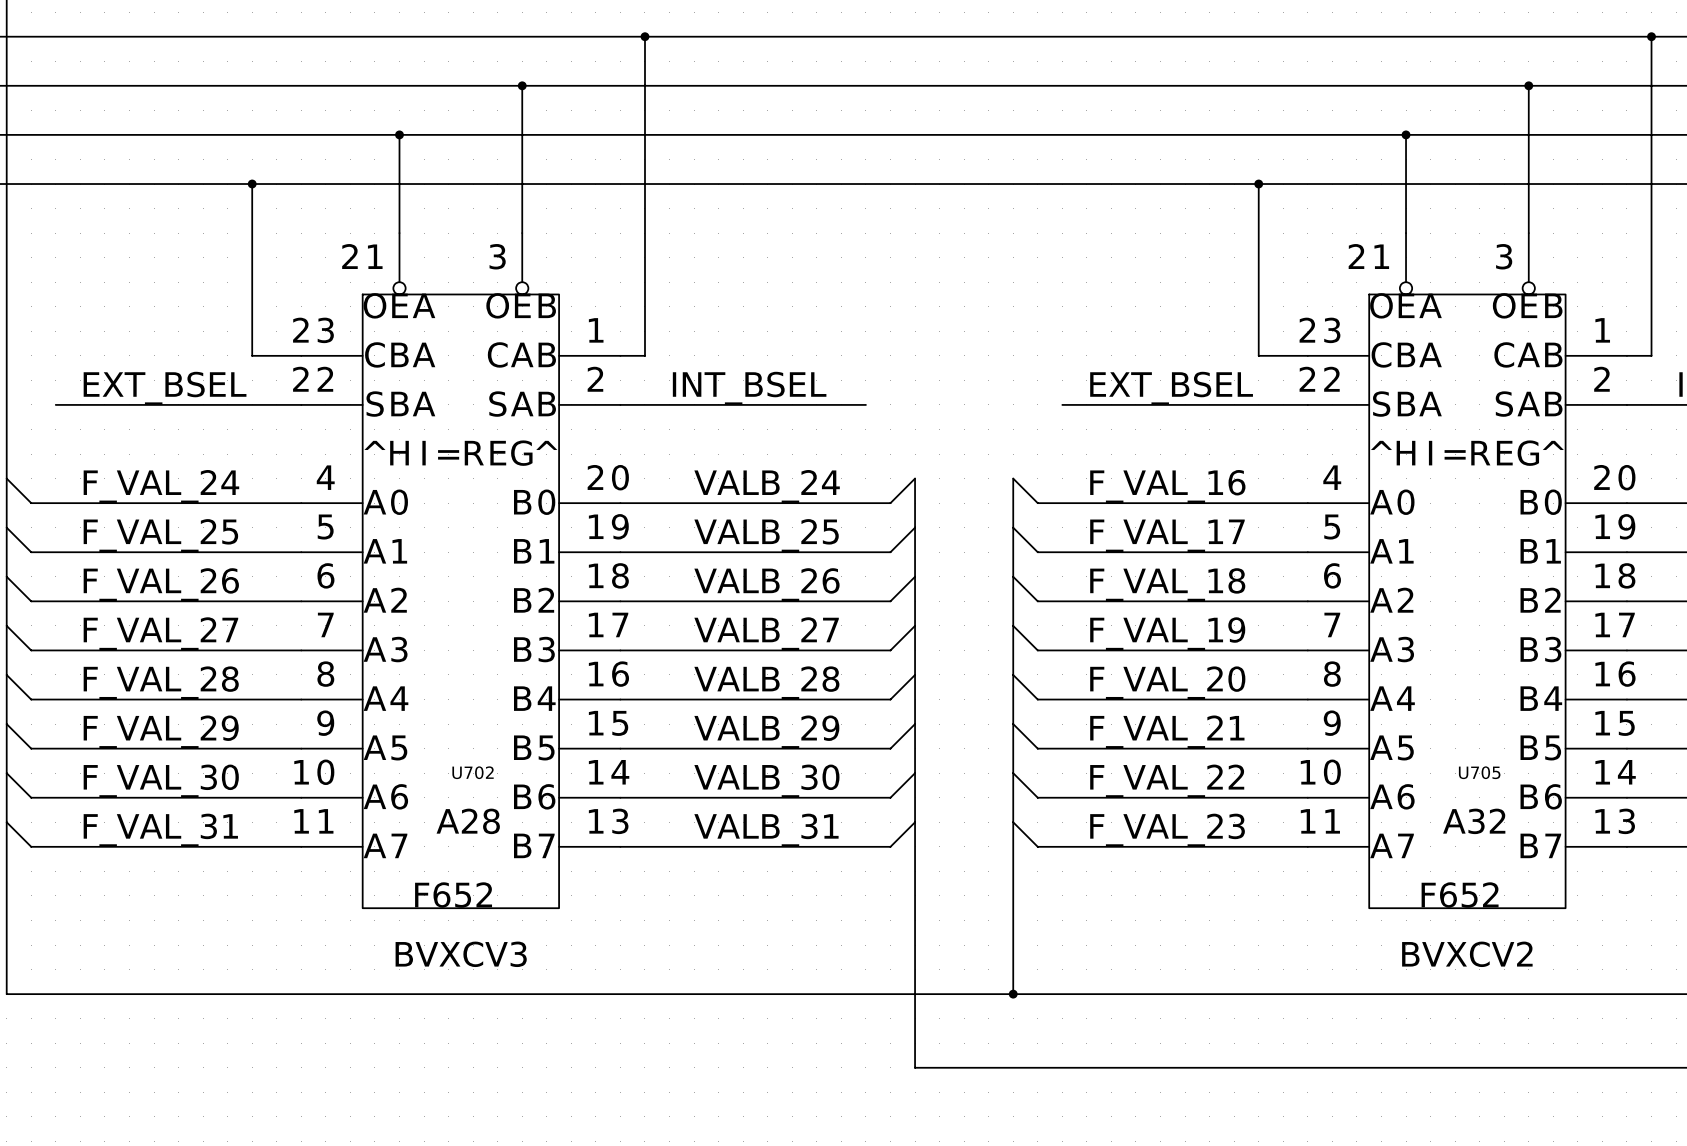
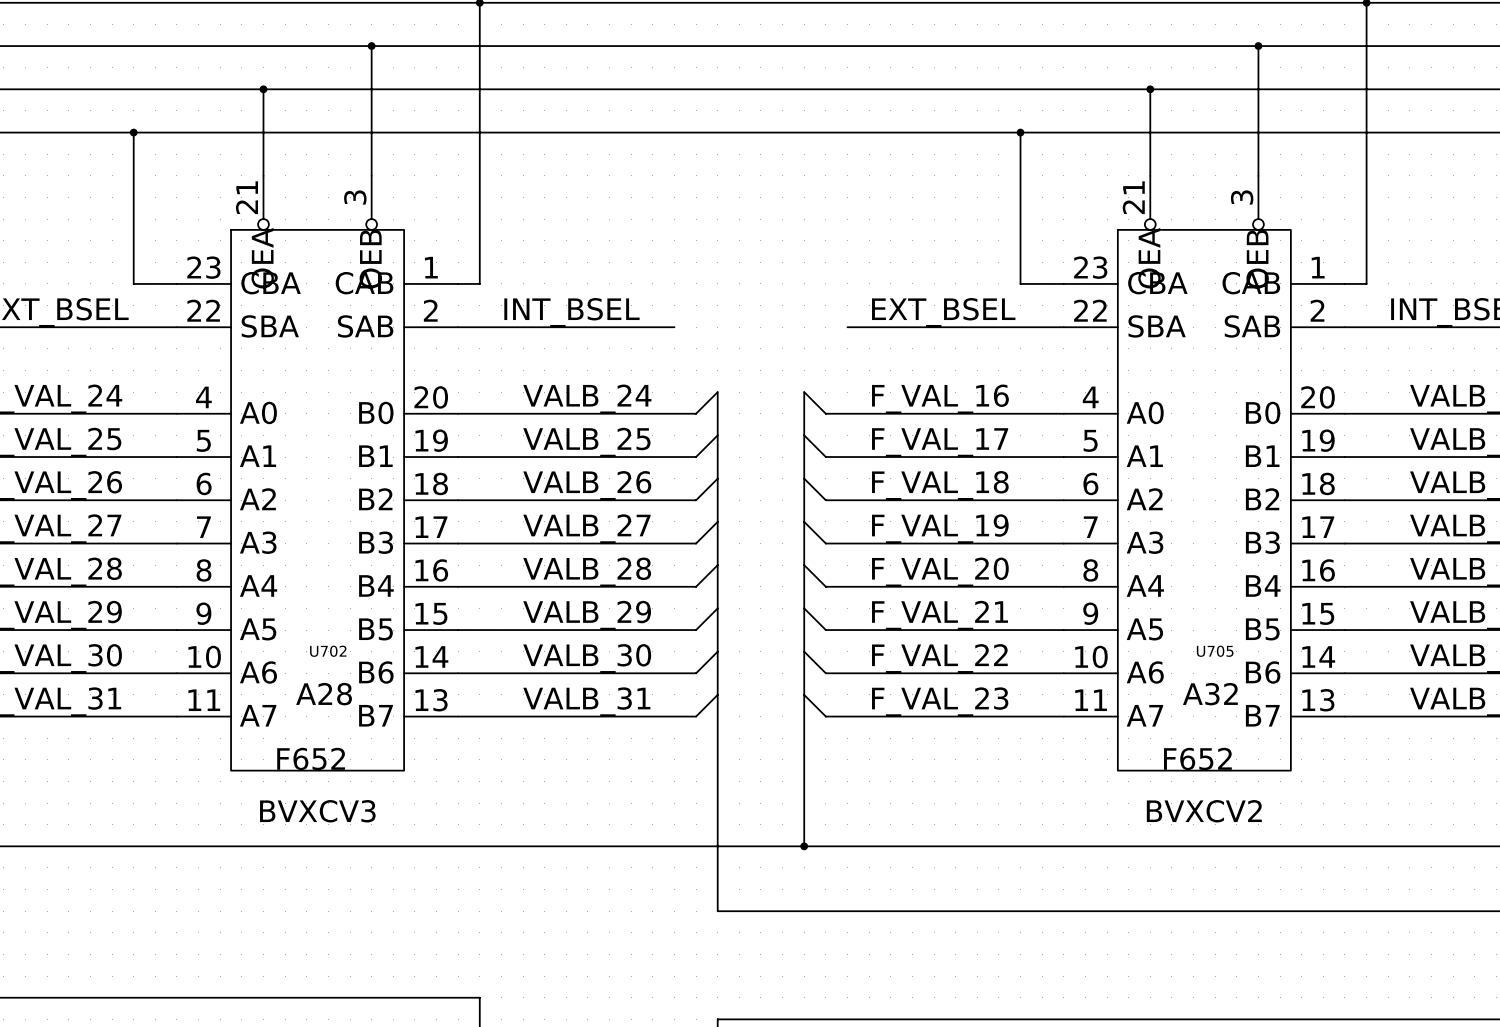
U702 symbol: [301, 233, 621, 909] -> [176, 175, 459, 771]
U705 symbol: [1307, 233, 1627, 909] -> [1063, 175, 1345, 771]

